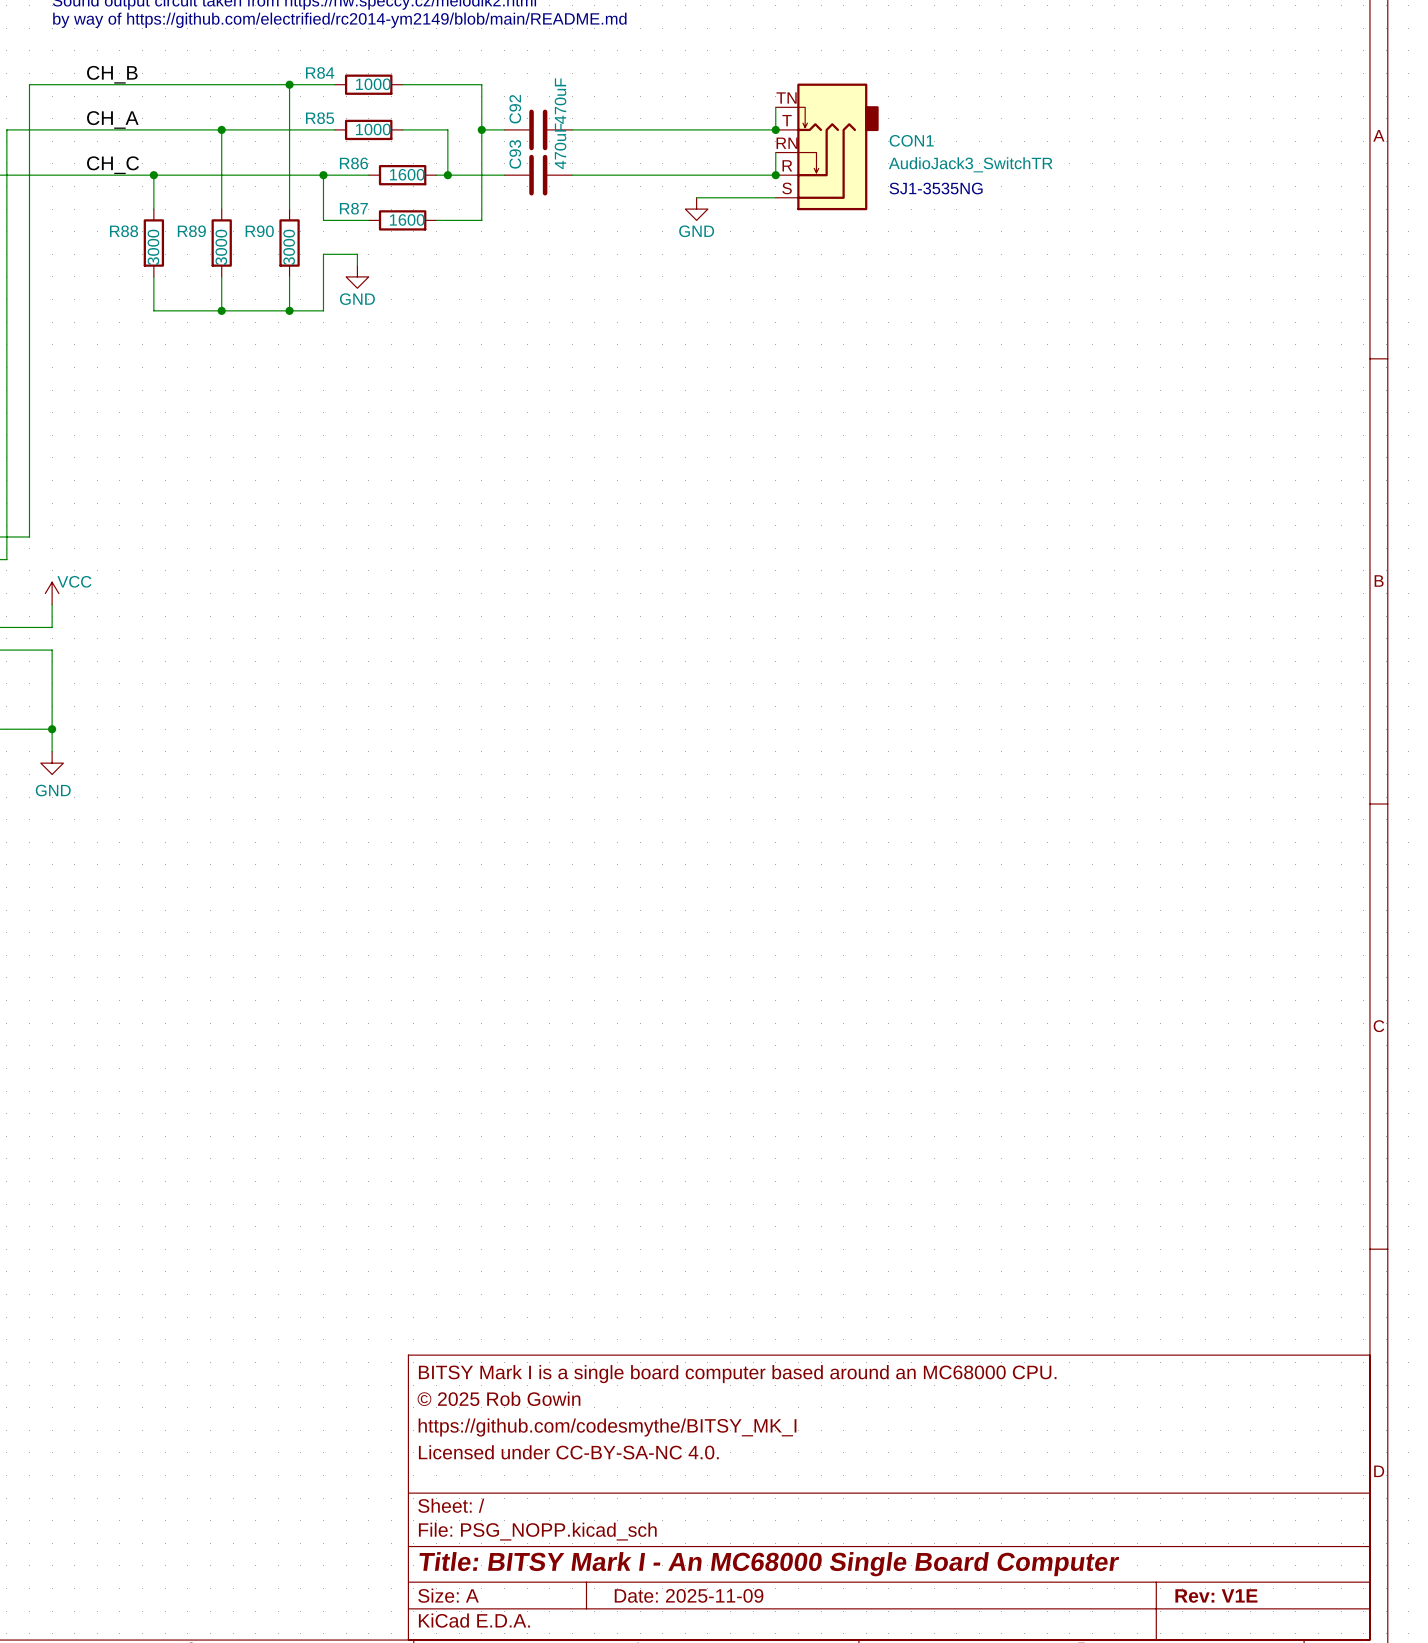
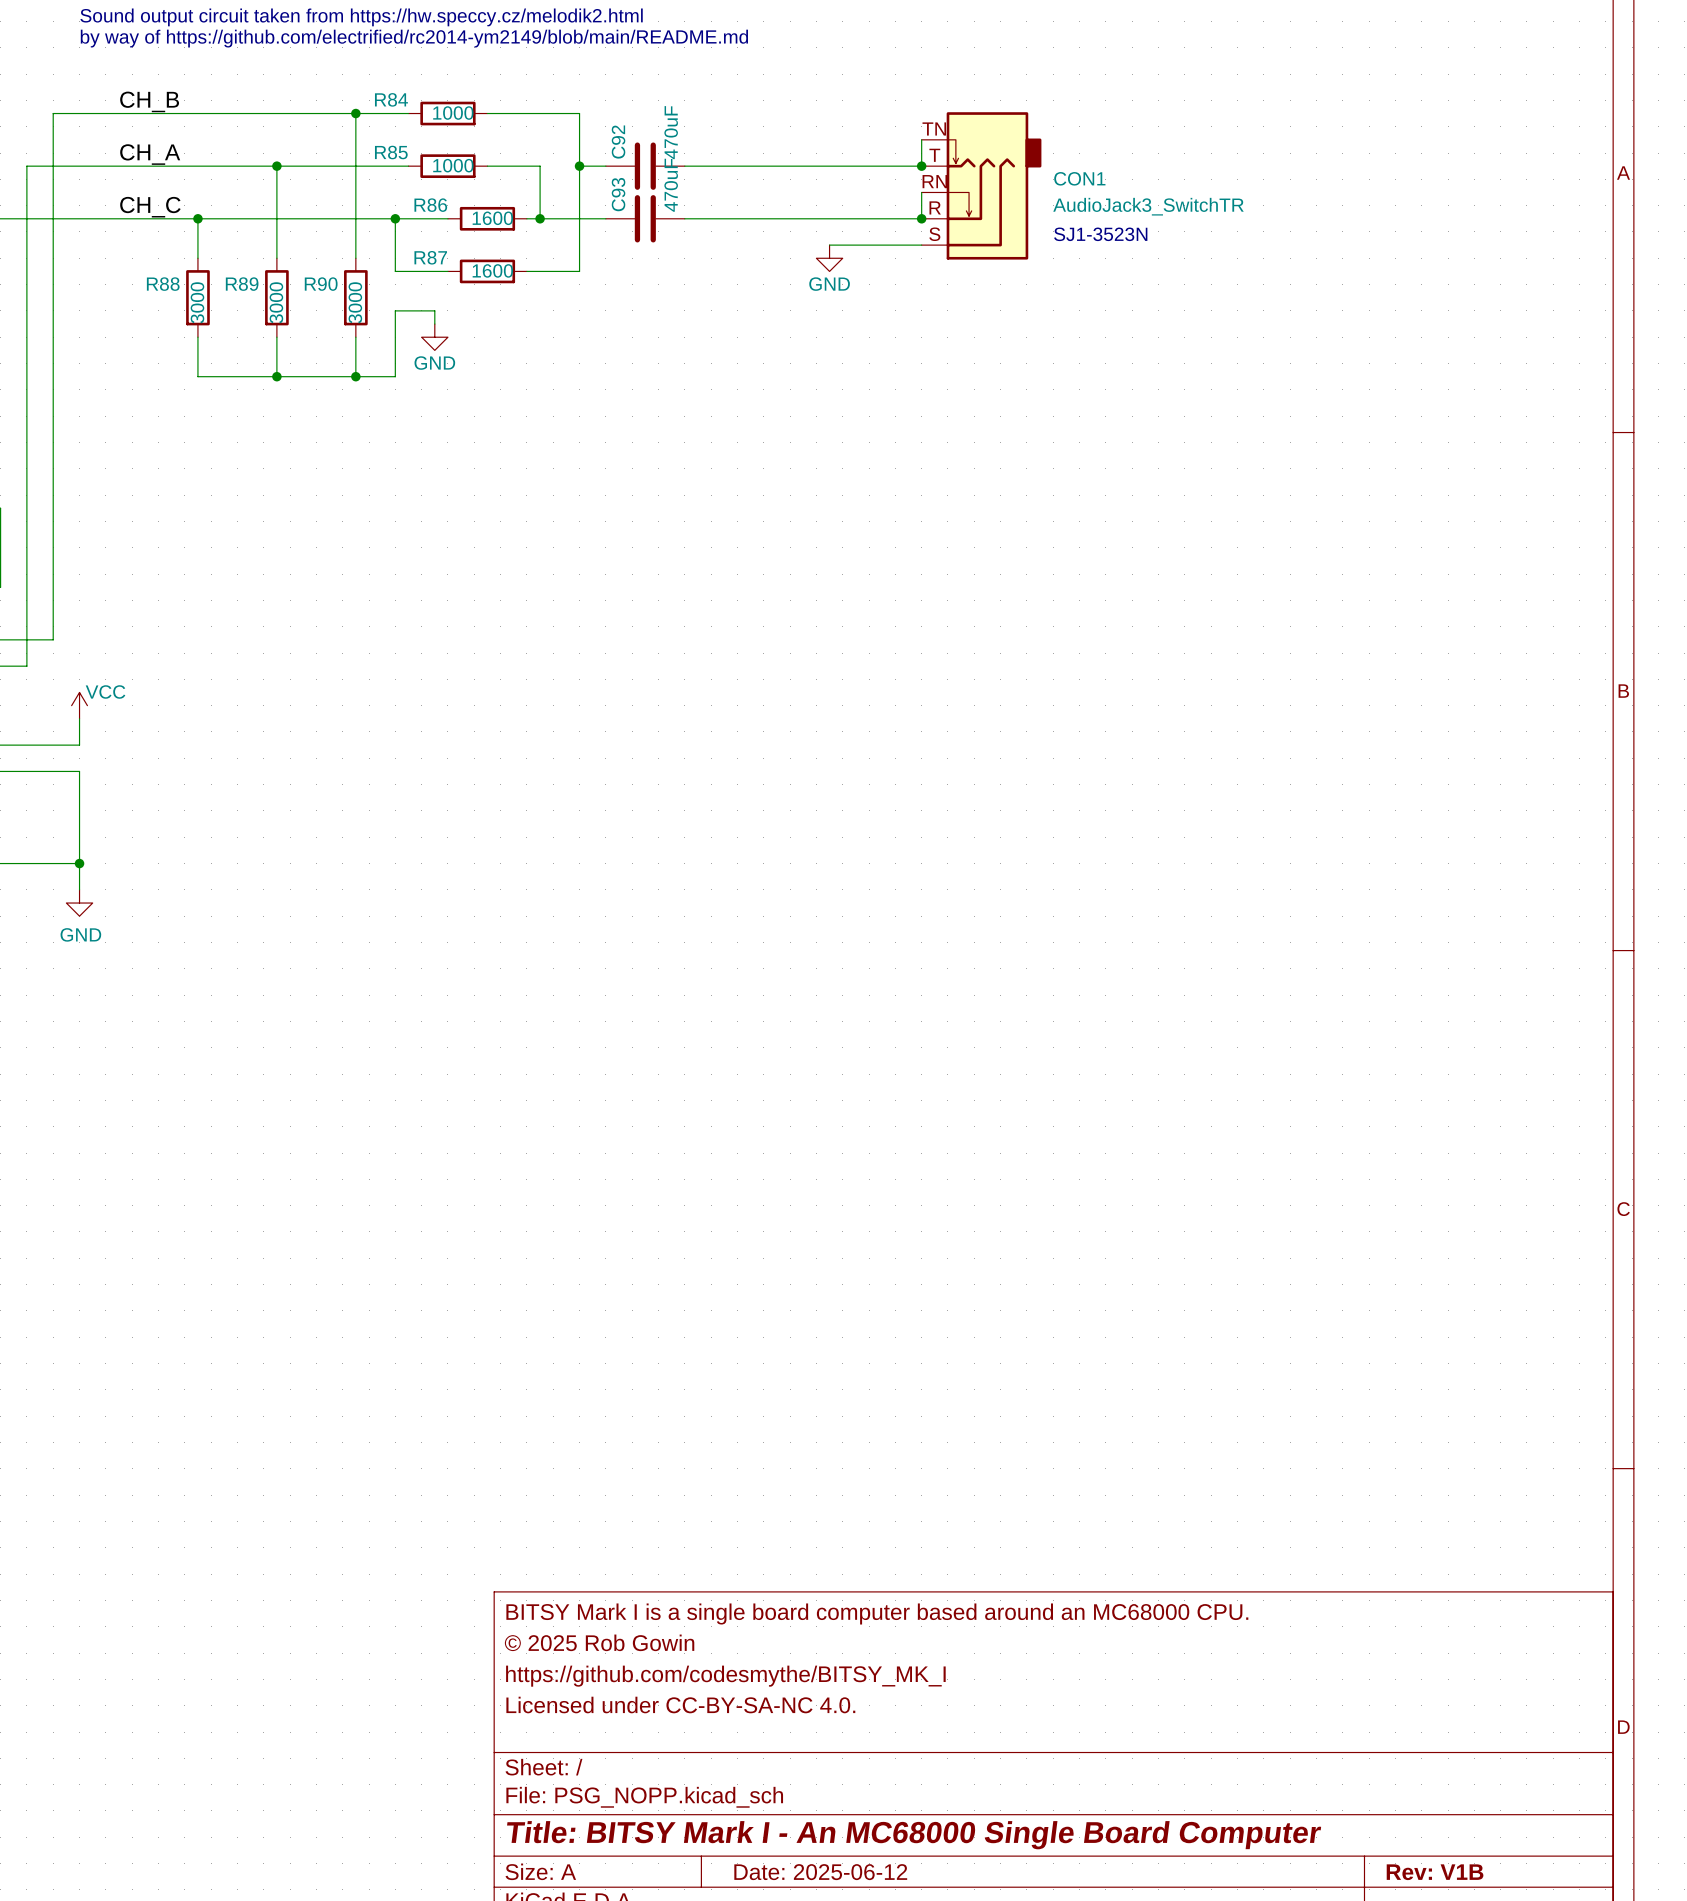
text: SJ1-3535NG (936, 188) -> SJ1-3523N (1100, 234)
title block: Date: 2025-11-09 (689, 1595) -> Date: 2025-06-12 (820, 1872)
title block: Rev: V1E (1216, 1596) -> Rev: V1B (1435, 1872)

